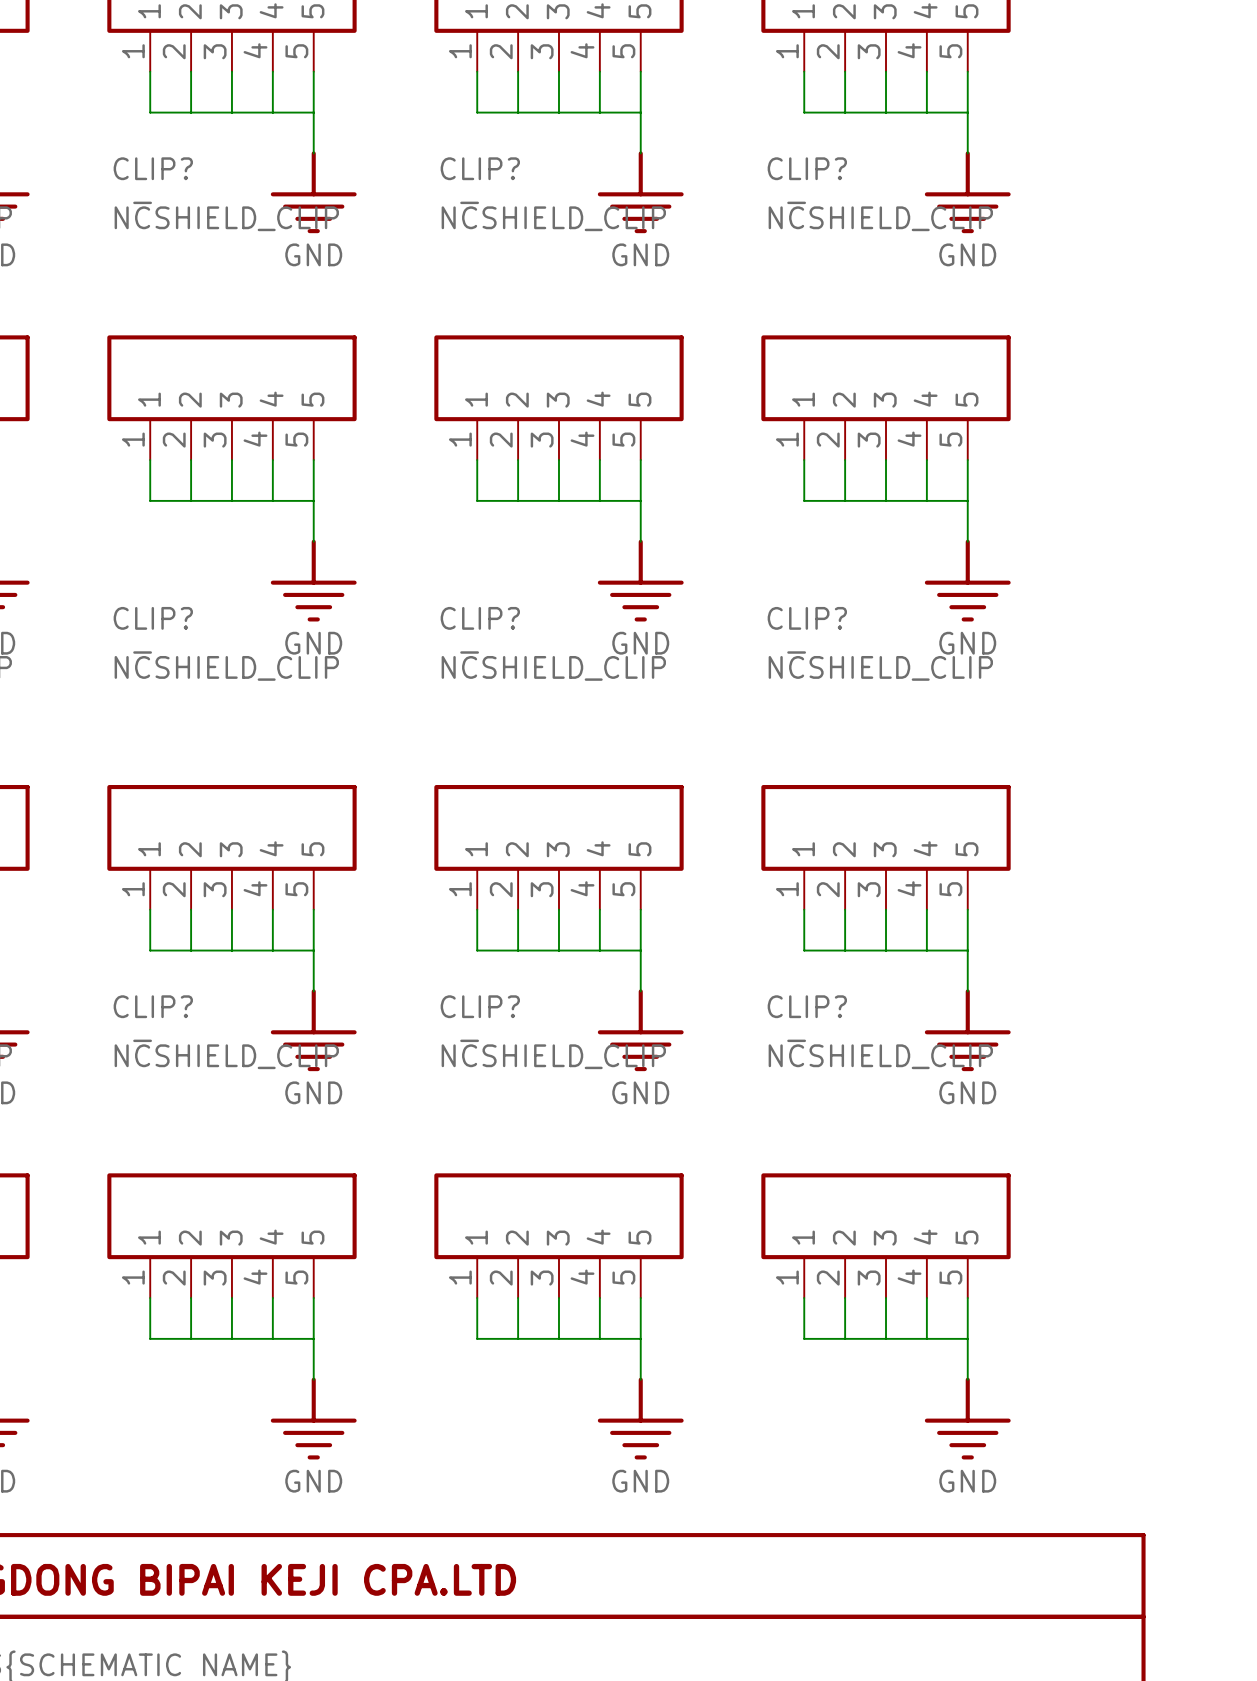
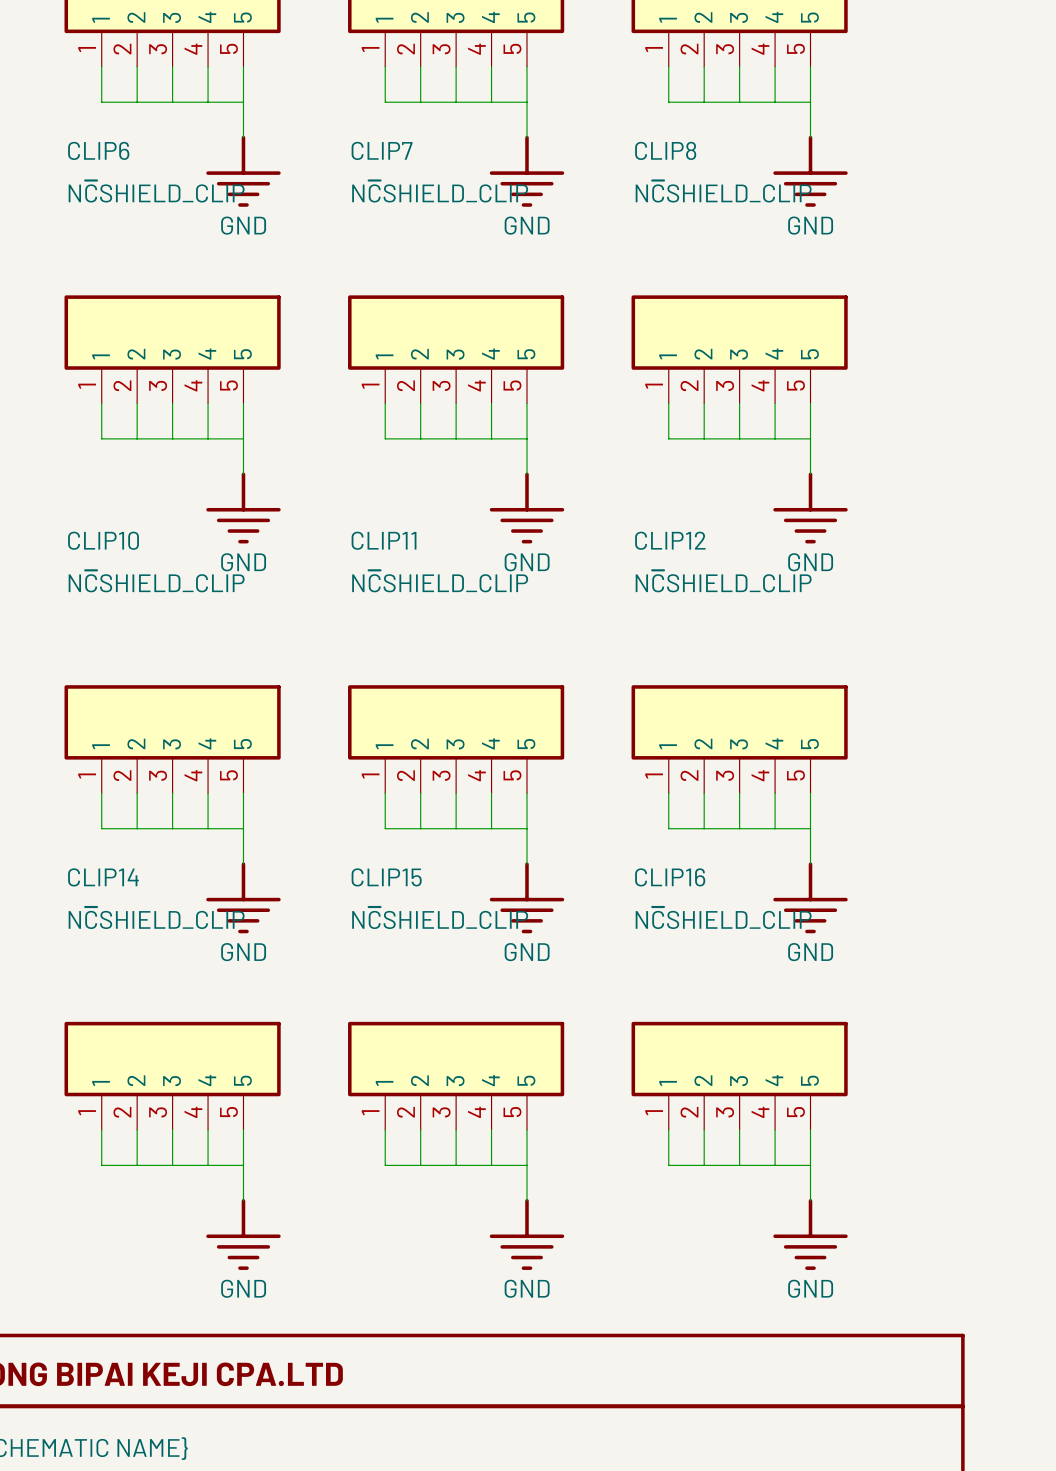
CLIP? name: CLIP? (153, 168) -> CLIP6 (98, 150)
CLIP? name: CLIP? (480, 168) -> CLIP7 (382, 150)
CLIP? name: CLIP? (807, 168) -> CLIP8 (665, 150)
CLIP? name: CLIP? (153, 618) -> CLIP10 (103, 540)
CLIP? name: CLIP? (480, 618) -> CLIP11 (384, 540)
CLIP? name: CLIP? (807, 618) -> CLIP12 (670, 540)
CLIP? name: CLIP? (153, 1006) -> CLIP14 (103, 877)
CLIP? name: CLIP? (480, 1006) -> CLIP15 (386, 877)
CLIP? name: CLIP? (807, 1006) -> CLIP16 (670, 877)

